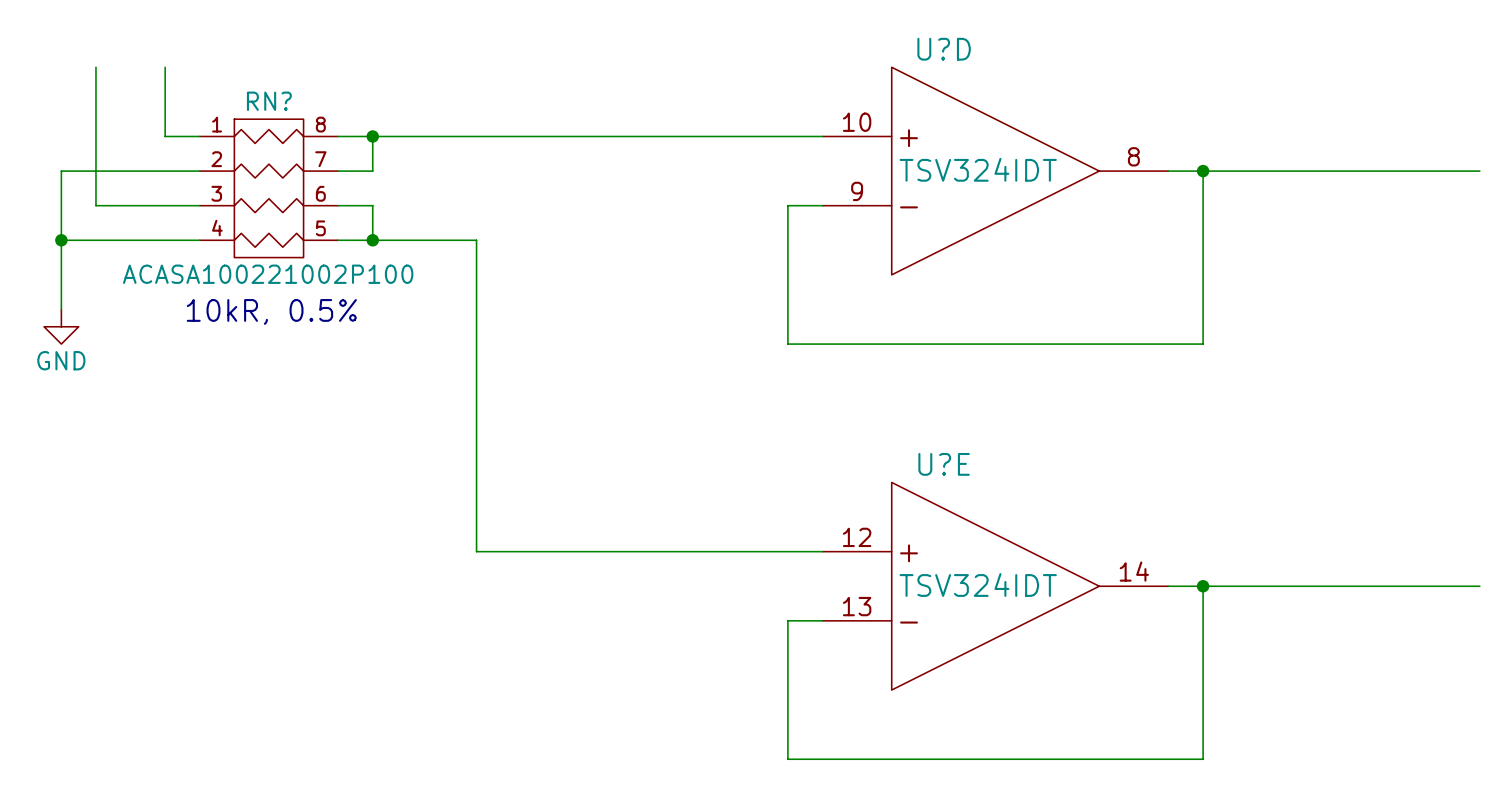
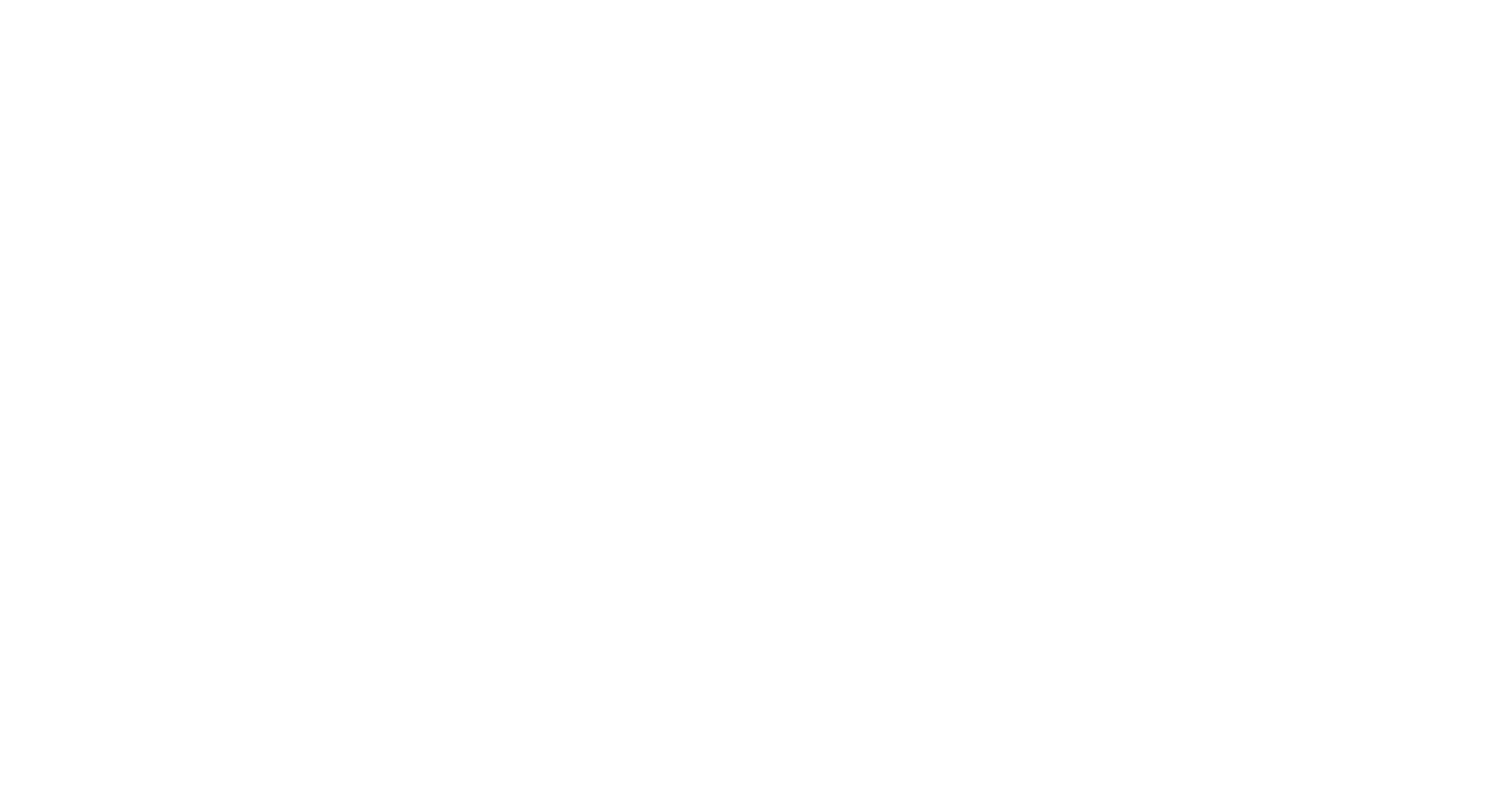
wire: (95, 67) (95, 205) (199, 205) -> none
wire: (165, 67) (165, 136) (199, 136) -> none
wire: (338, 136) (822, 136) -> none
wire: (372, 136) (372, 171) (338, 171) -> none
junction: (372, 136) -> none
wire: (199, 171) (61, 171) (61, 309) -> none
U?D: TSV324IDT (995, 171) -> none
wire: (1168, 171) (1479, 171) -> none
wire: (1203, 171) (1203, 344) (787, 344) (787, 205) (822, 205) -> none
junction: (1203, 171) -> none
RN?: ACASA100221002P100 (268, 188) -> none
wire: (338, 205) (372, 205) (372, 240) -> none
wire: (61, 240) (199, 240) -> none
junction: (61, 240) -> none
wire: (338, 240) (476, 240) (476, 551) (822, 551) -> none
junction: (372, 240) -> none
text: 10kR, 0.5% (271, 311) -> none
power symbol: GND (61, 326) -> none
U?E: TSV324IDT (995, 586) -> none
wire: (1168, 586) (1479, 586) -> none
wire: (1203, 586) (1203, 759) (787, 759) (787, 620) (822, 620) -> none
junction: (1203, 586) -> none

